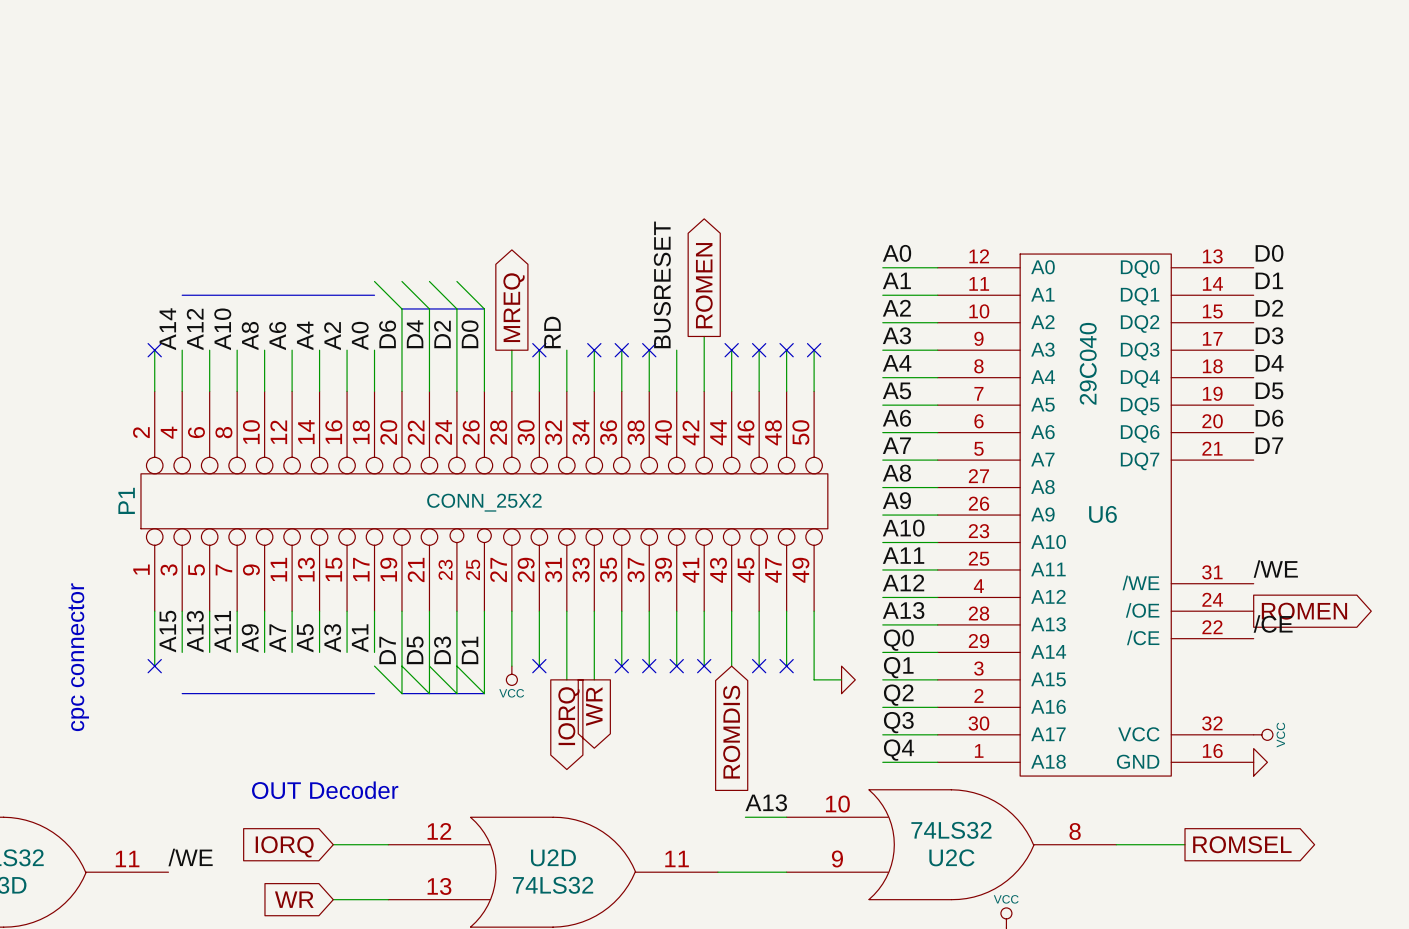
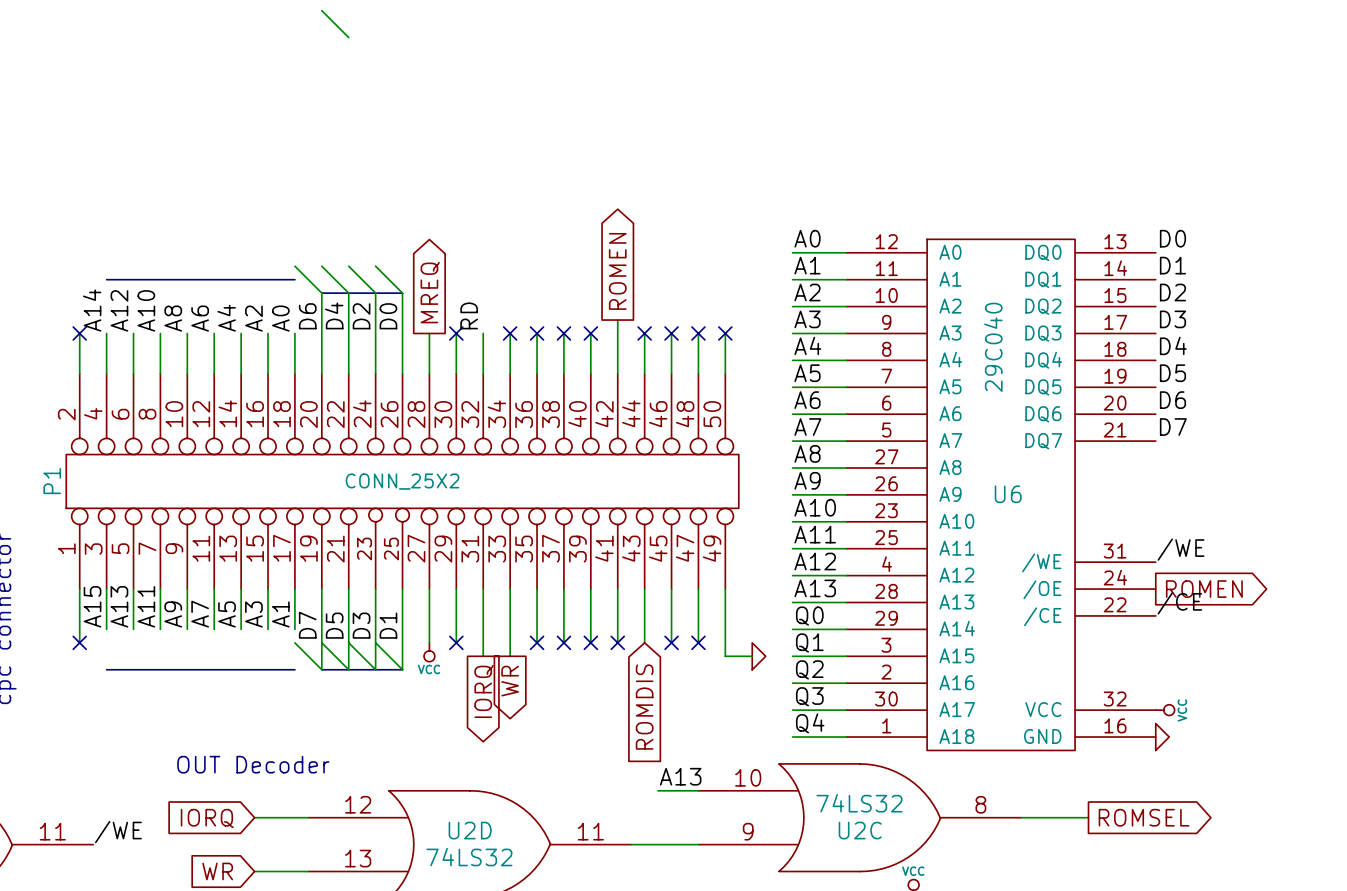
wire: none -> (321, 10) (348, 37)
label: BUSRESET (662, 284) -> none
no-connect mark: none -> (590, 333)

